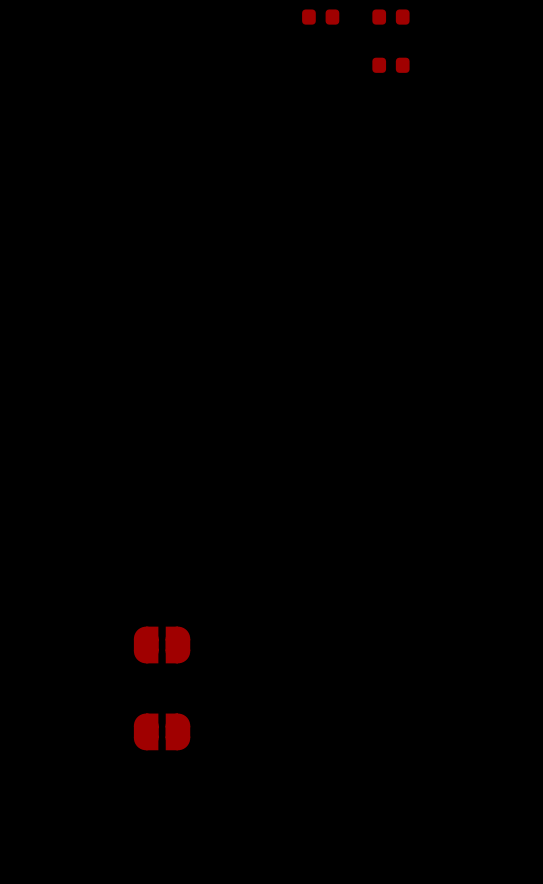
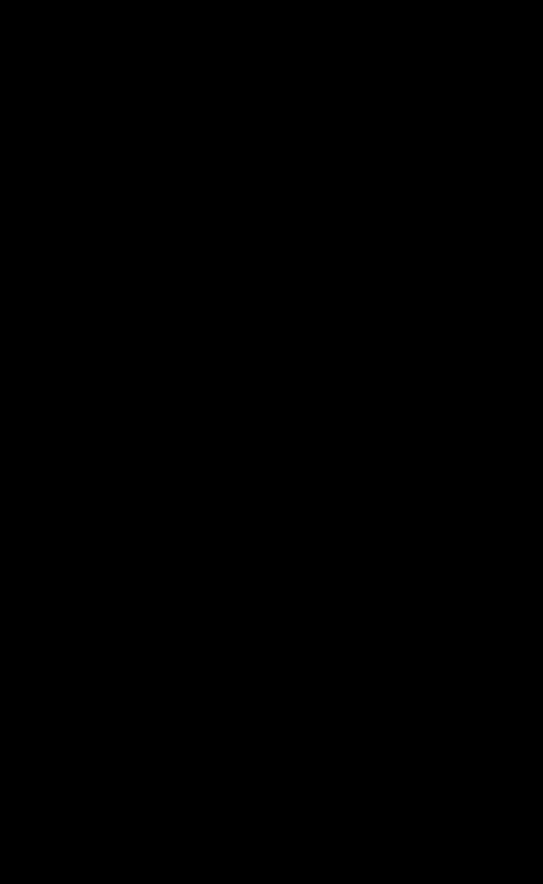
part: (320, 17) -> none
part: (390, 17) -> none
part: (390, 65) -> none
part: (162, 645) -> none
part: (162, 731) -> none

